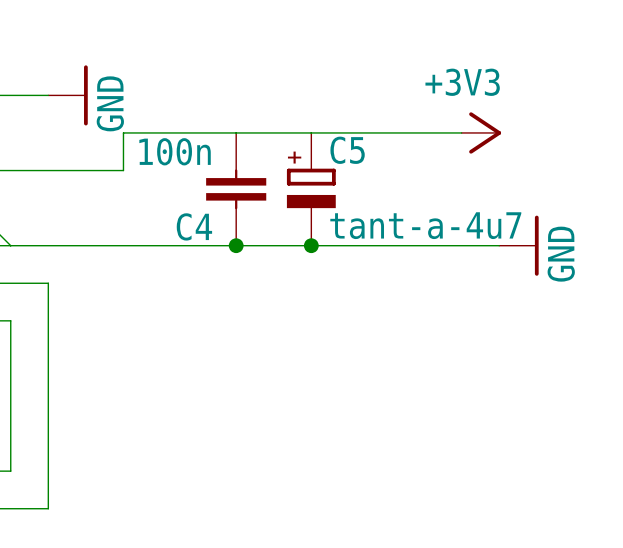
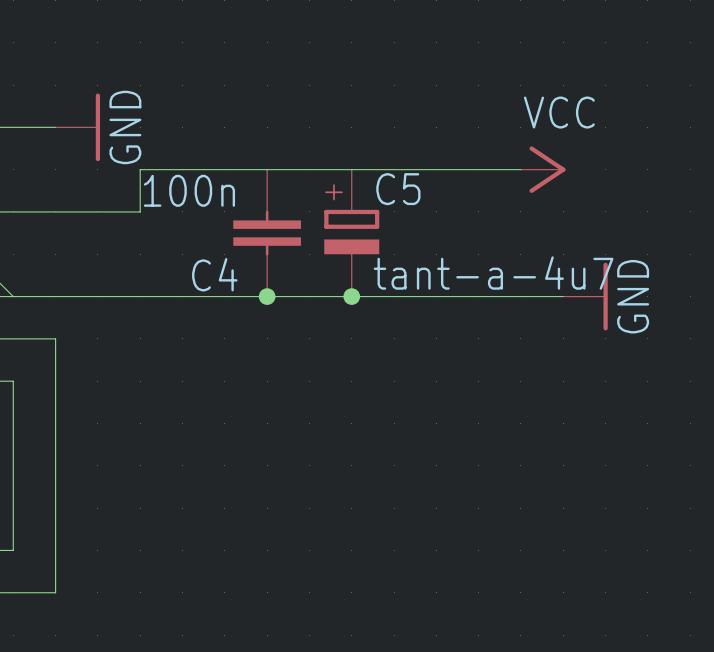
power symbol: +3V3 (481, 132) -> VCC (543, 169)

